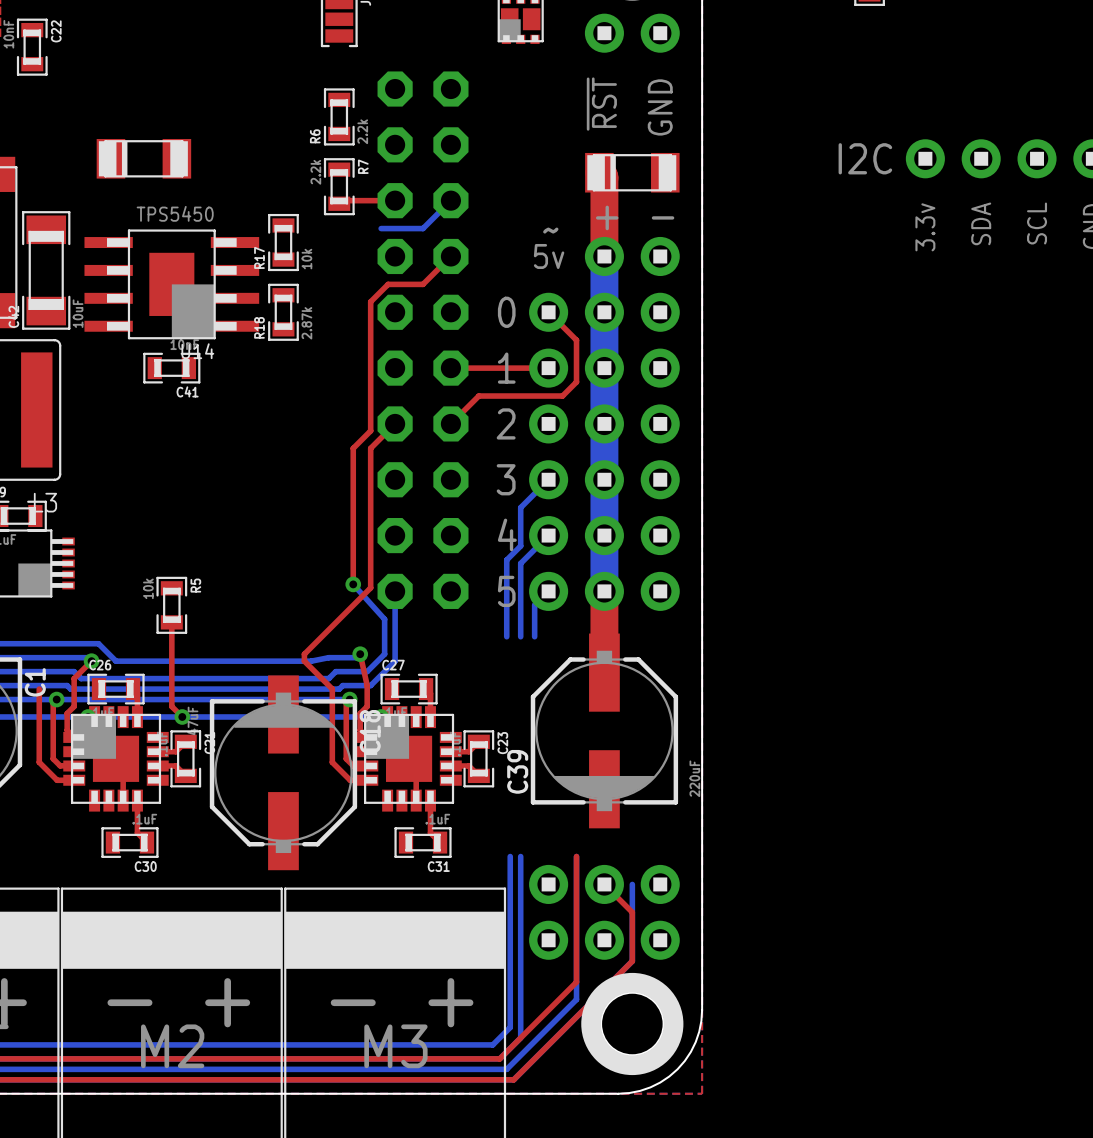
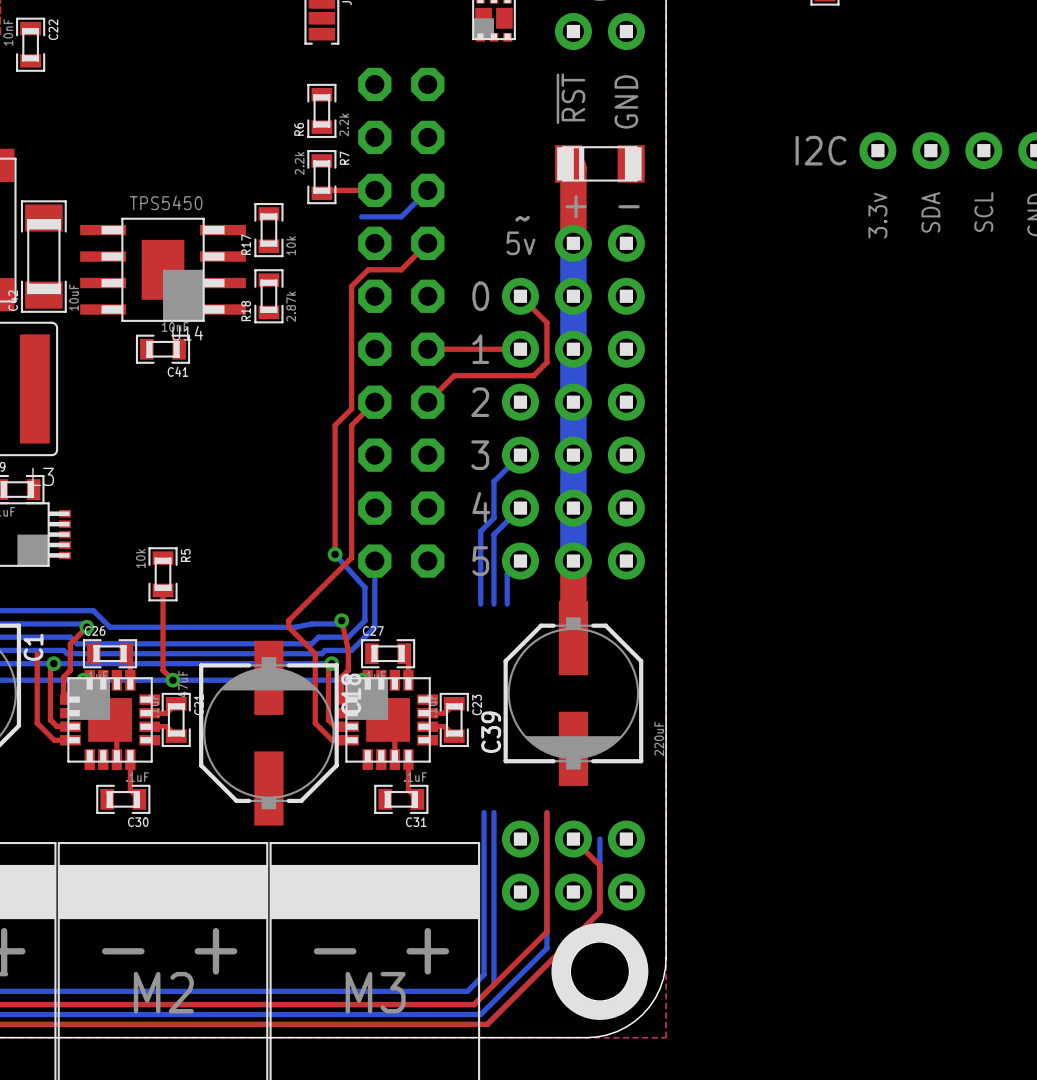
part: (143, 158) -> none

